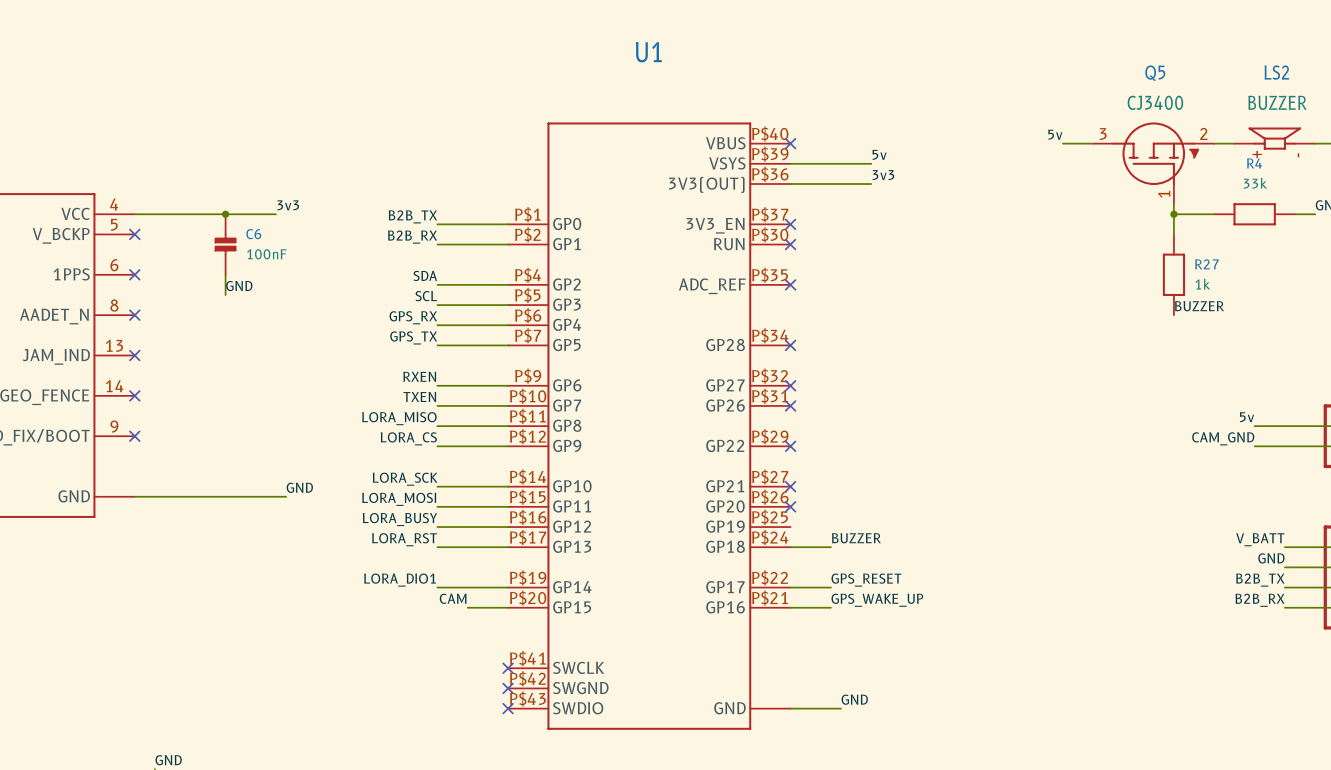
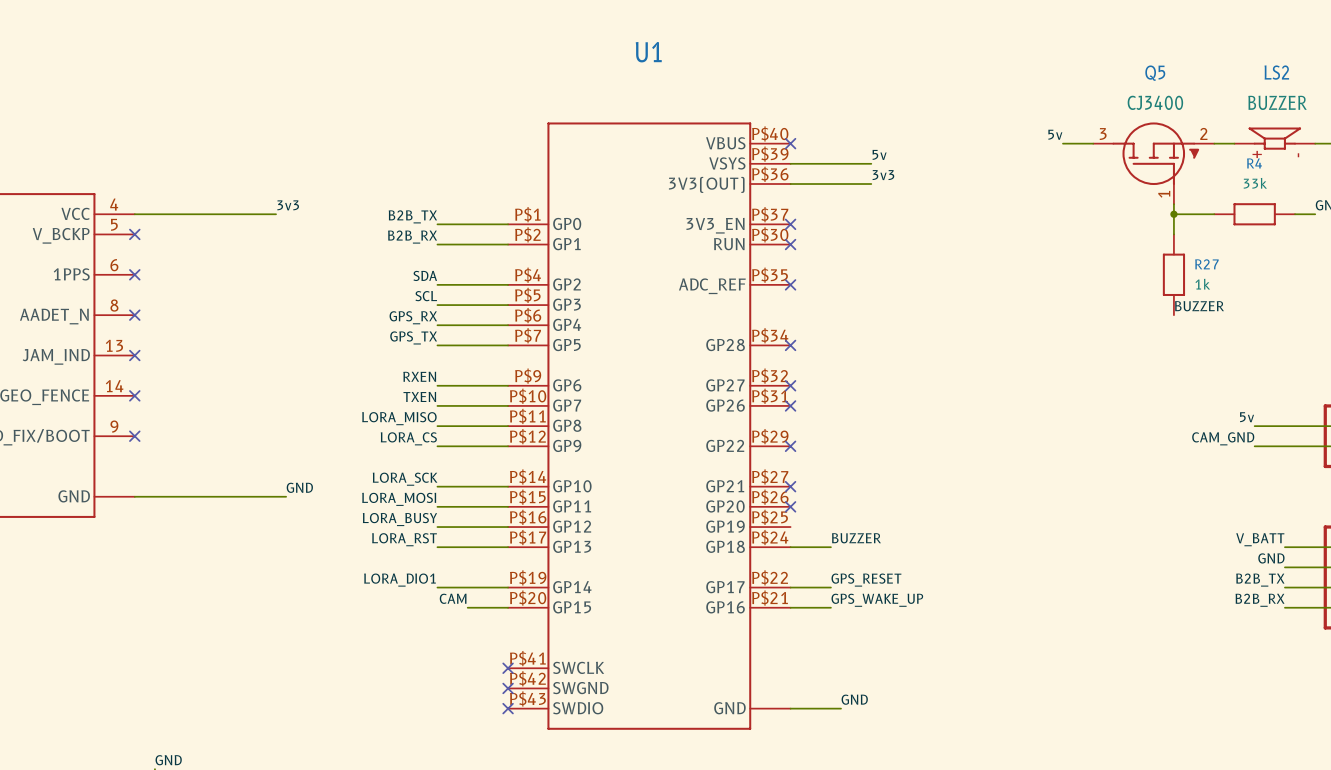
junction: (225, 214) -> none
C6: 100nF (225, 244) -> none
wire: (225, 274) (225, 294) -> none
label: GND (239, 286) -> none

